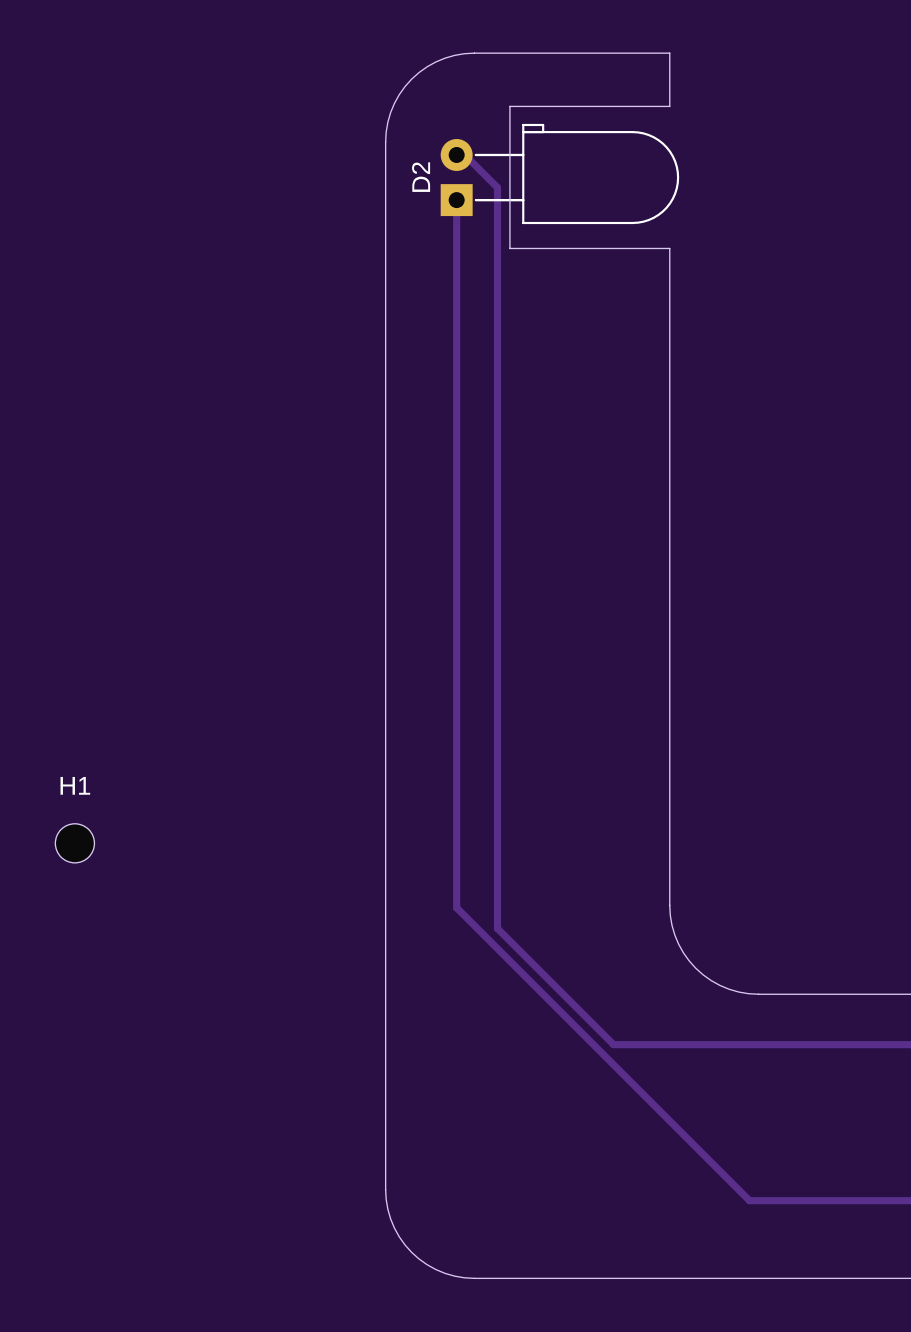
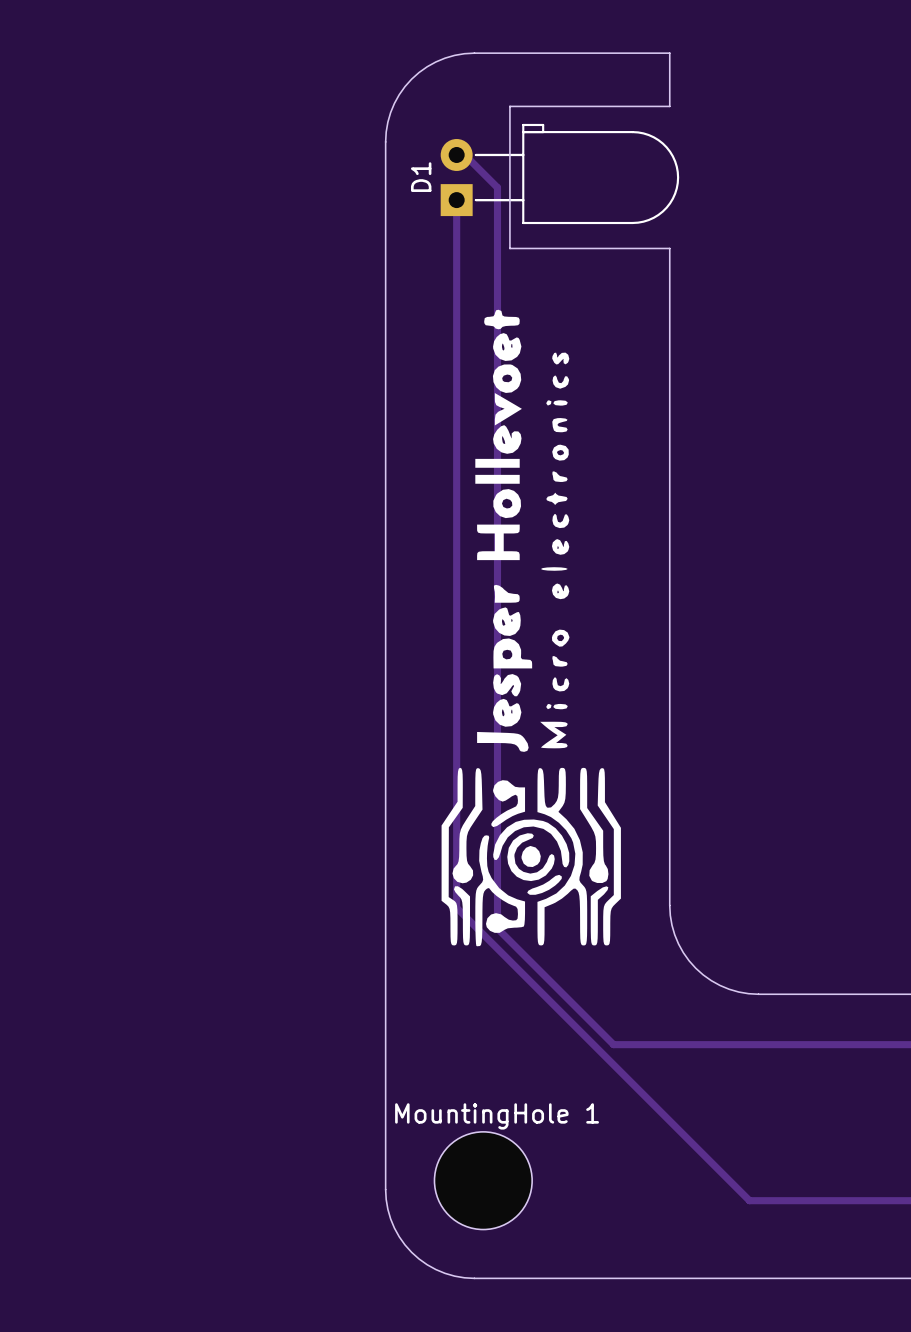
D2 name: D2 (421, 177) -> D1 (421, 177)
drawing: none -> [441, 309, 621, 947]
H1: (74, 843) -> none
MountingHole 1: none -> (483, 1180)

